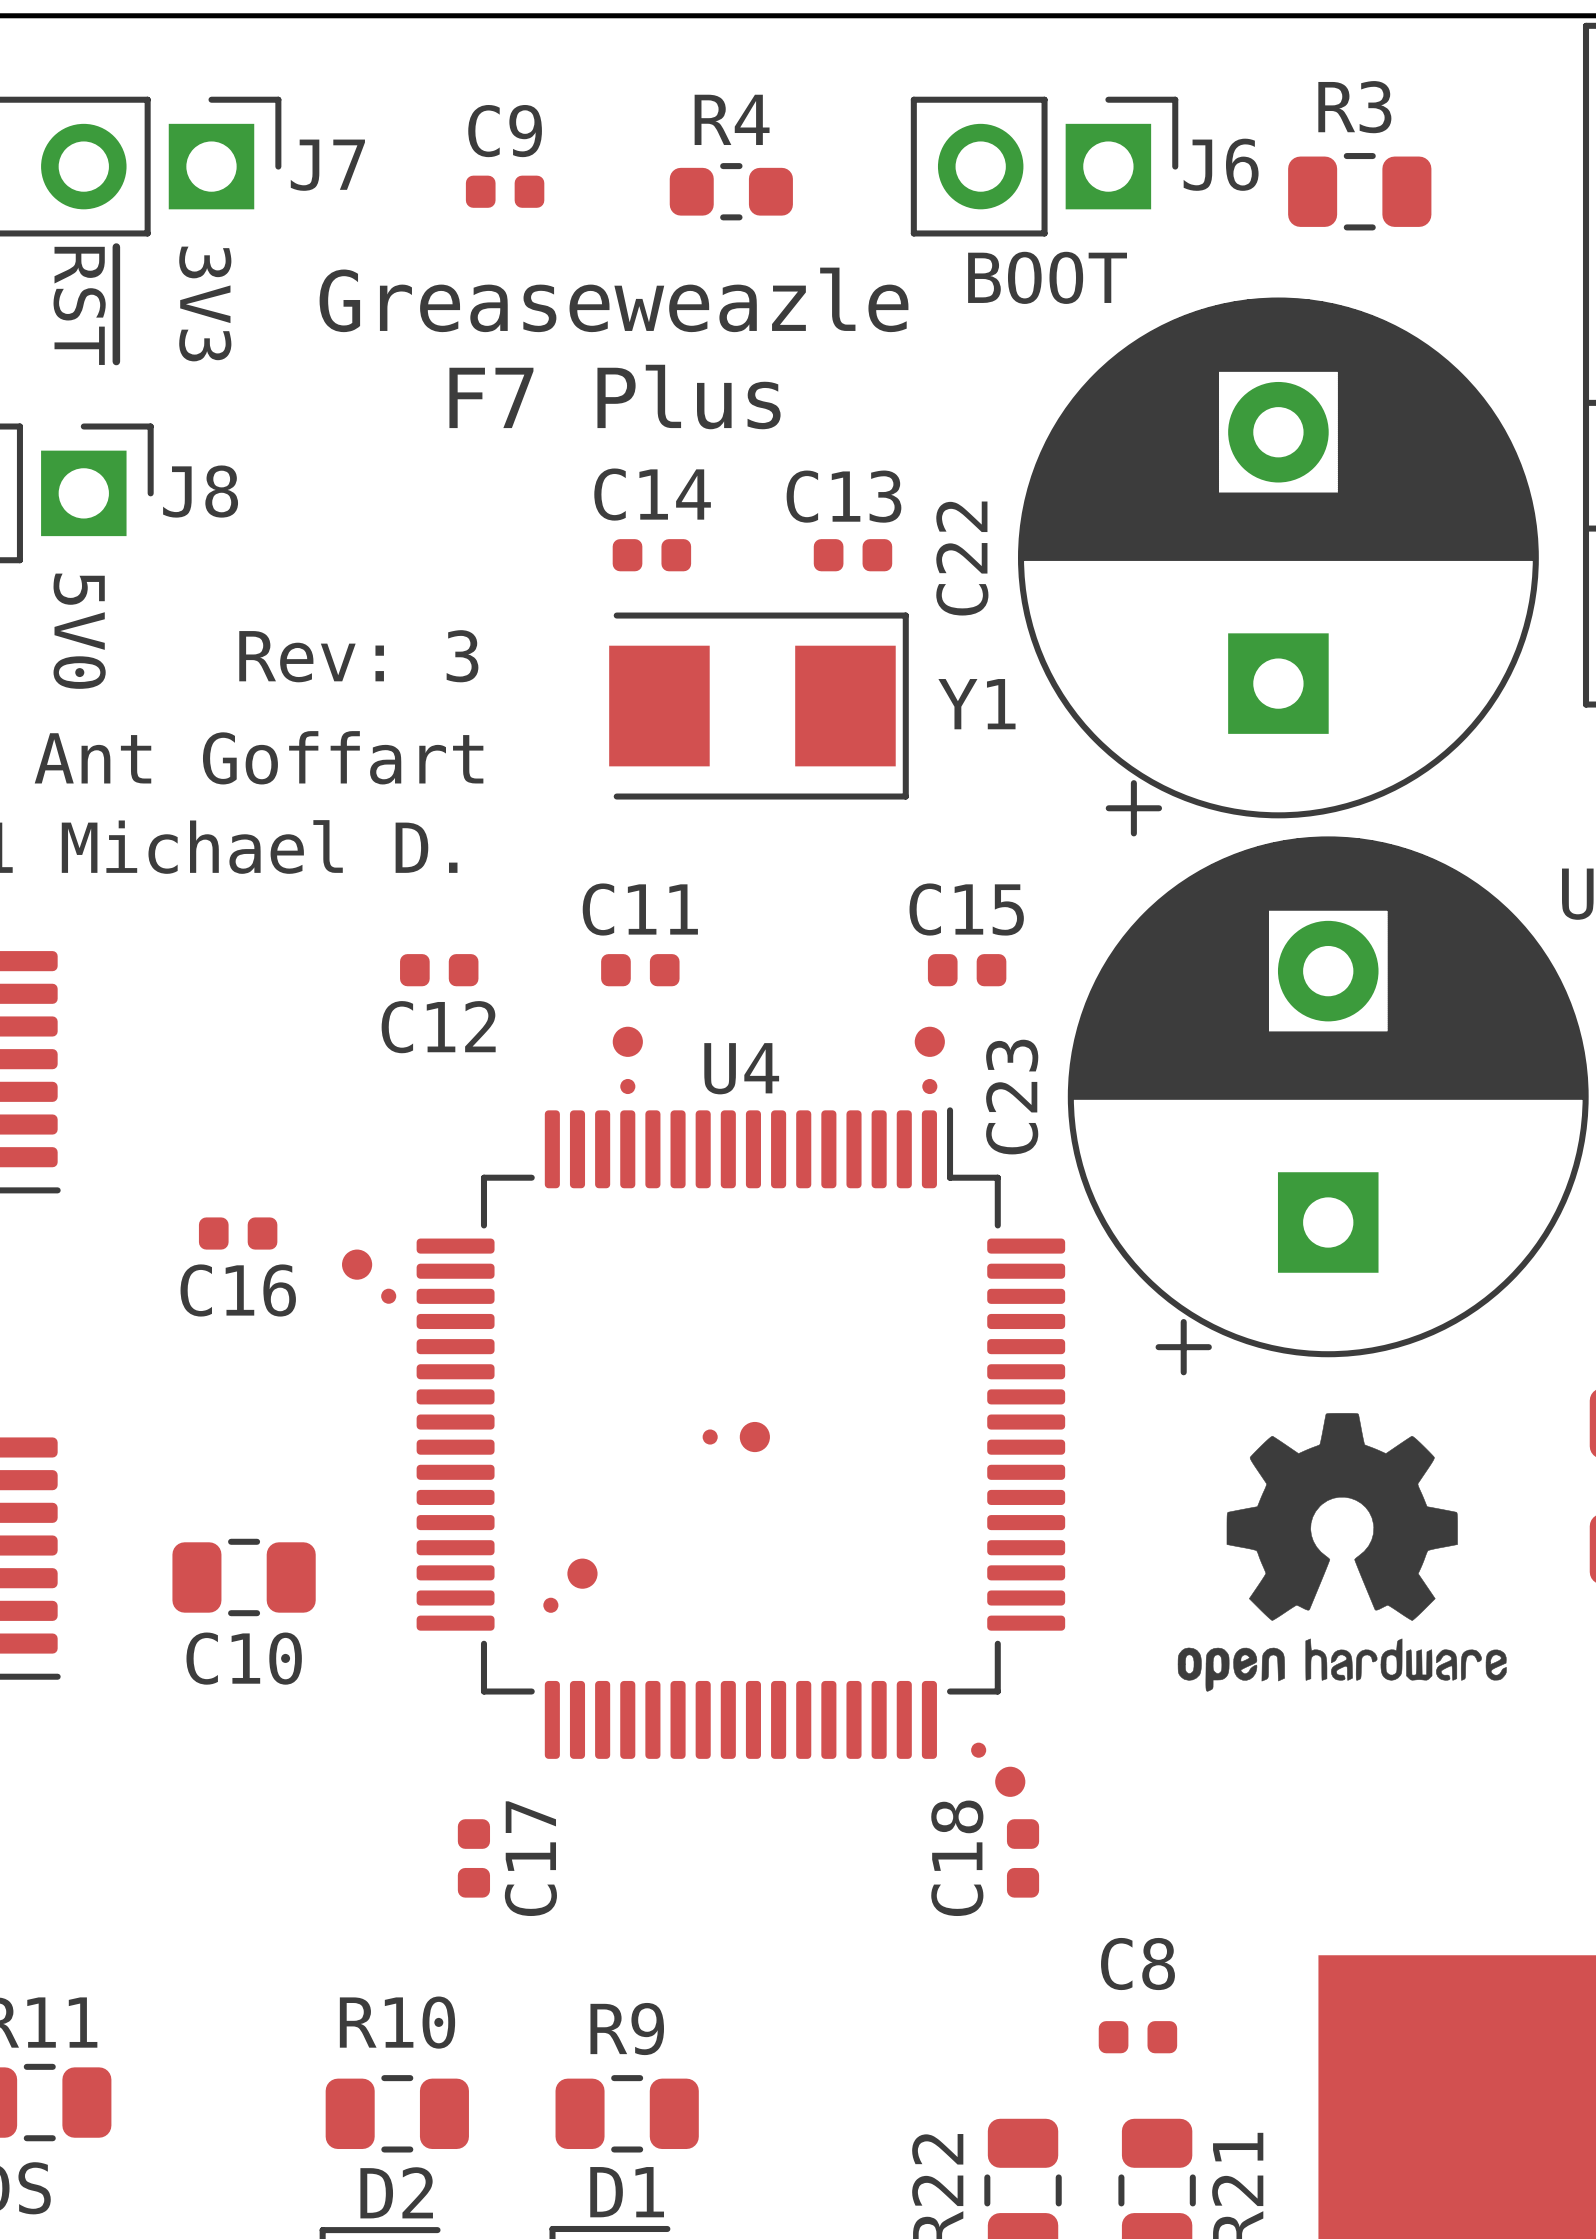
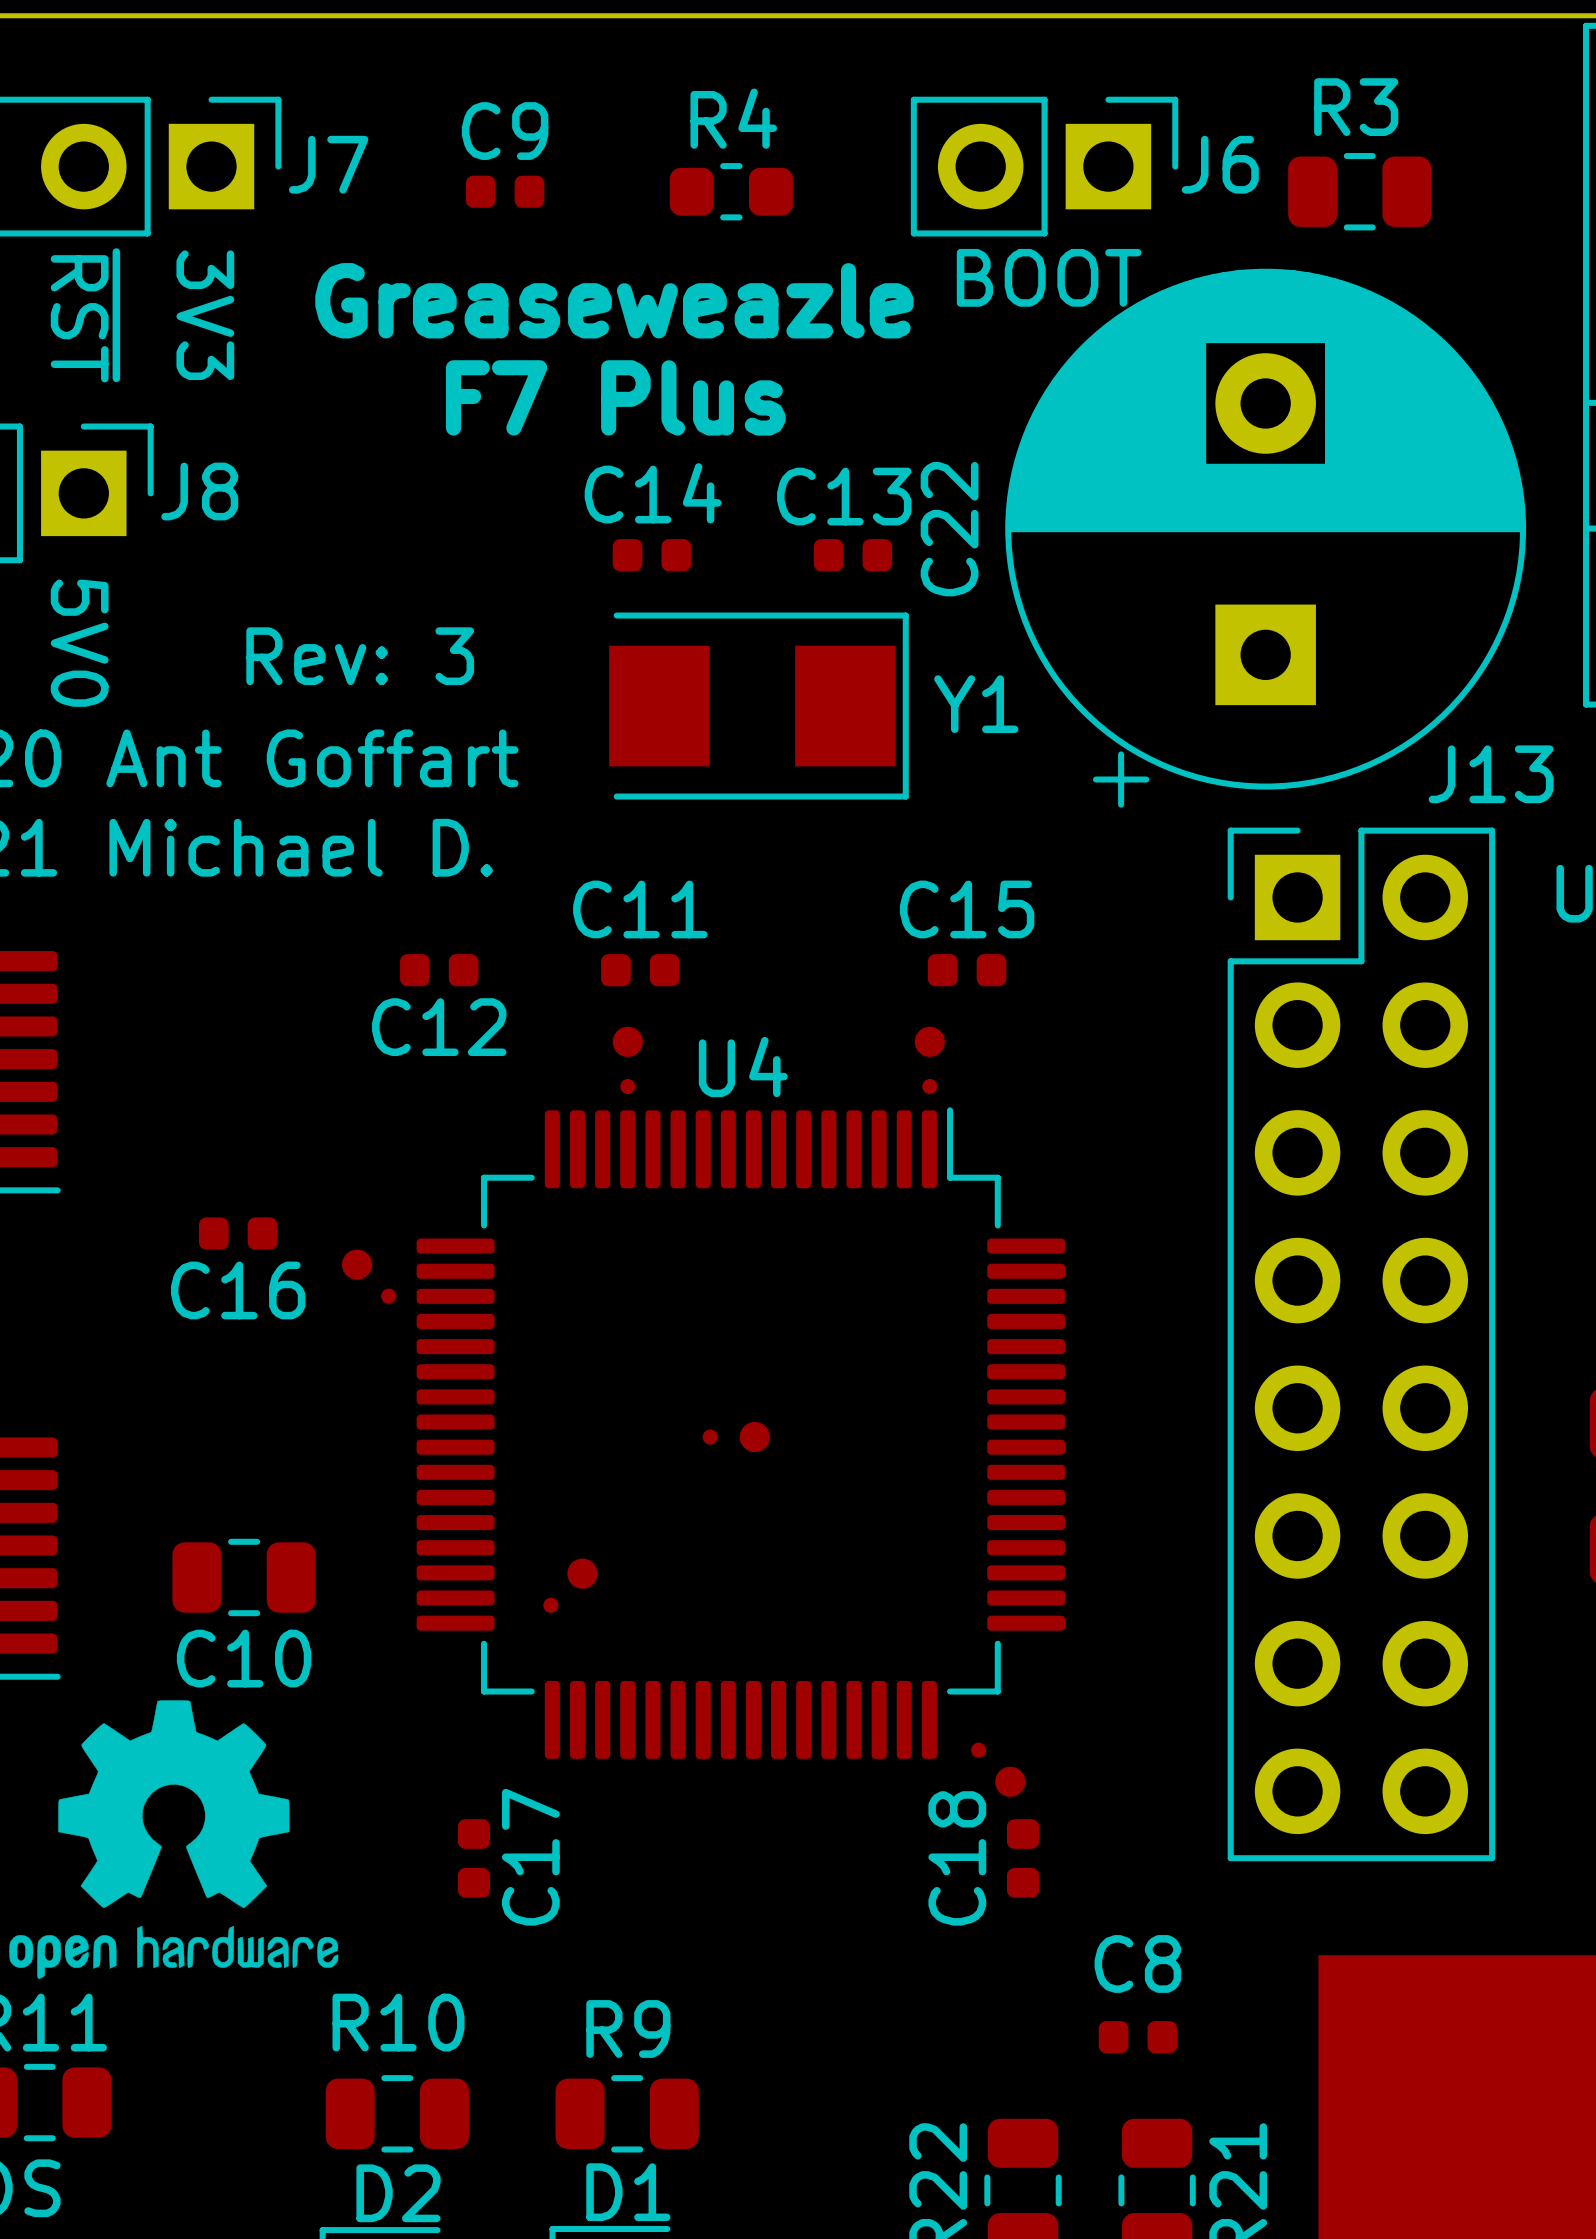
C22 position: (1278, 566) -> (1265, 538)
C23: (1328, 1105) -> none
J13: none -> (1361, 1344)
drawing position: (1342, 1552) -> (173, 1839)

